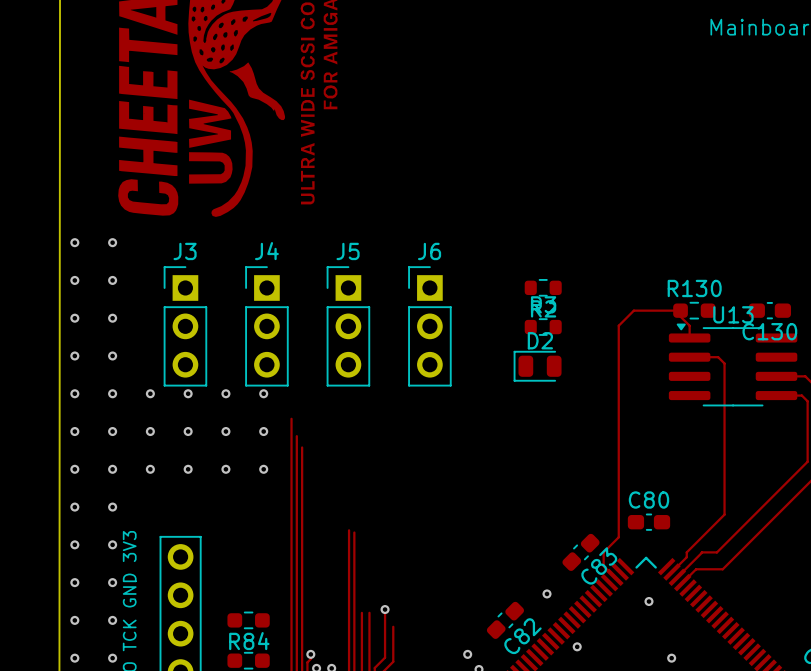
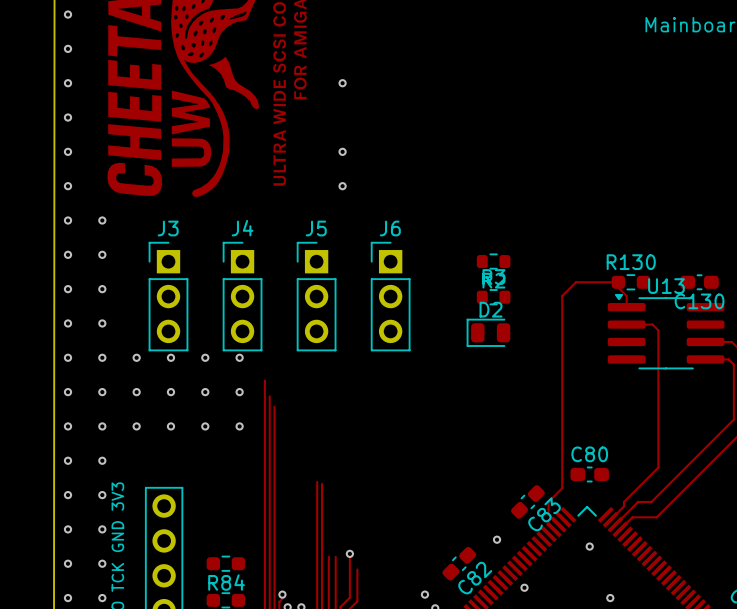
via: none -> (68, 14)
via: none -> (68, 48)
via: none -> (68, 83)
via: none -> (342, 83)
via: none -> (68, 117)
via: none -> (68, 151)
via: none -> (342, 151)
via: none -> (68, 186)
via: none -> (342, 186)

